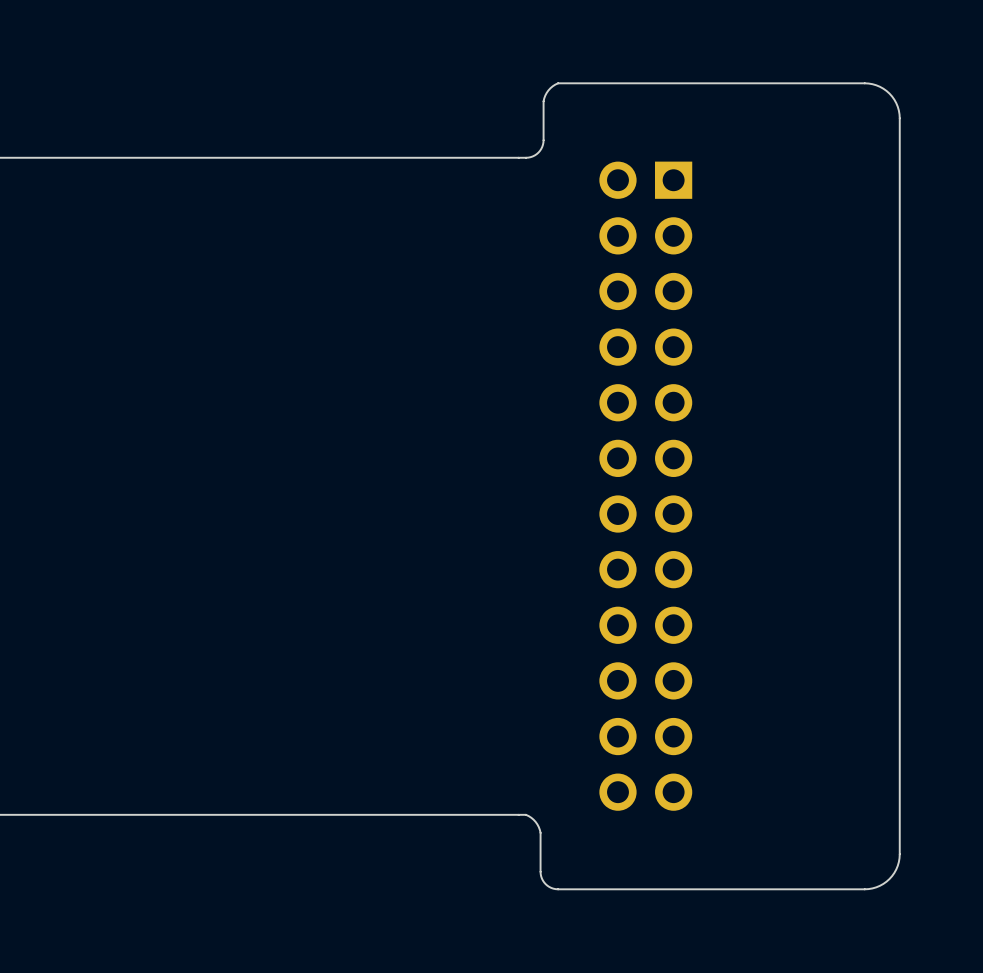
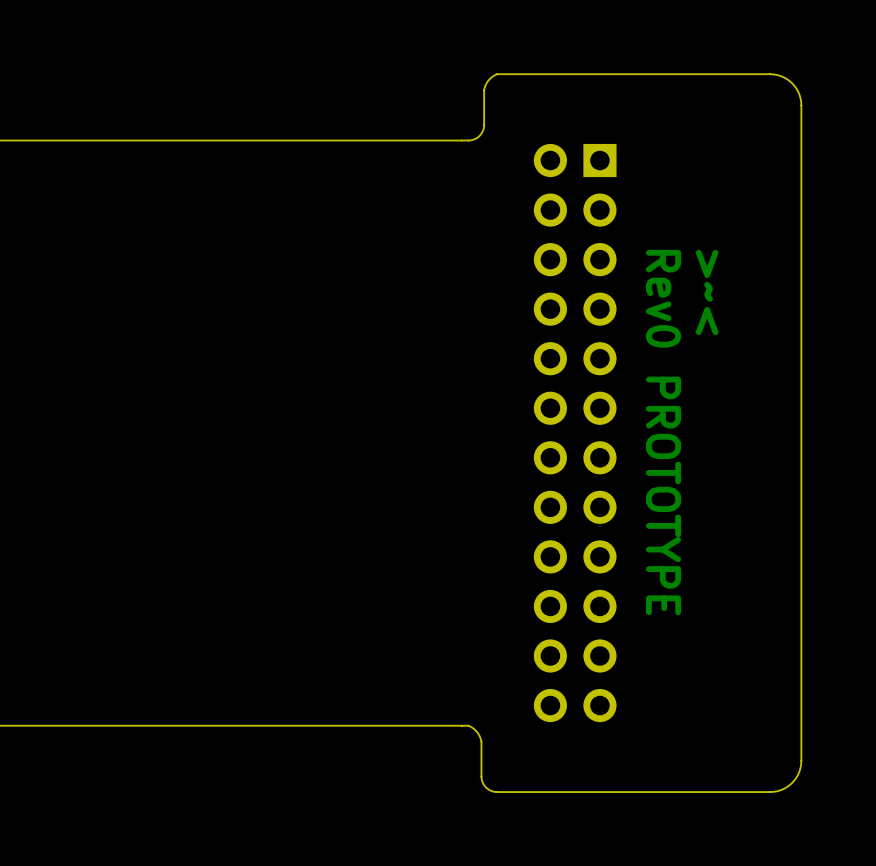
text: none -> >~< (707, 292)
text: none -> Rev0 PROTOTYPE (663, 432)

